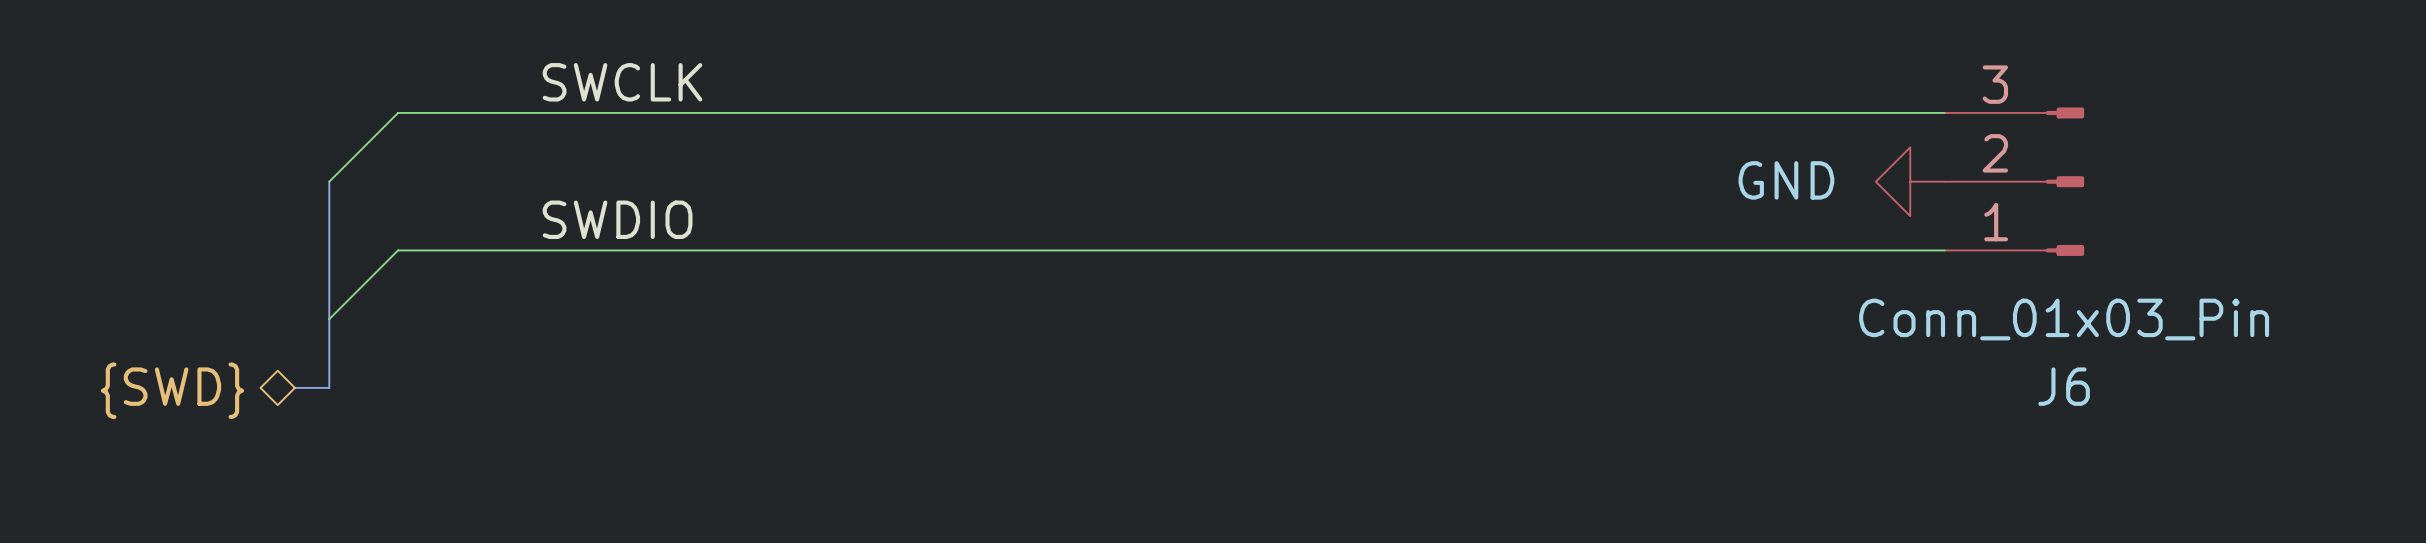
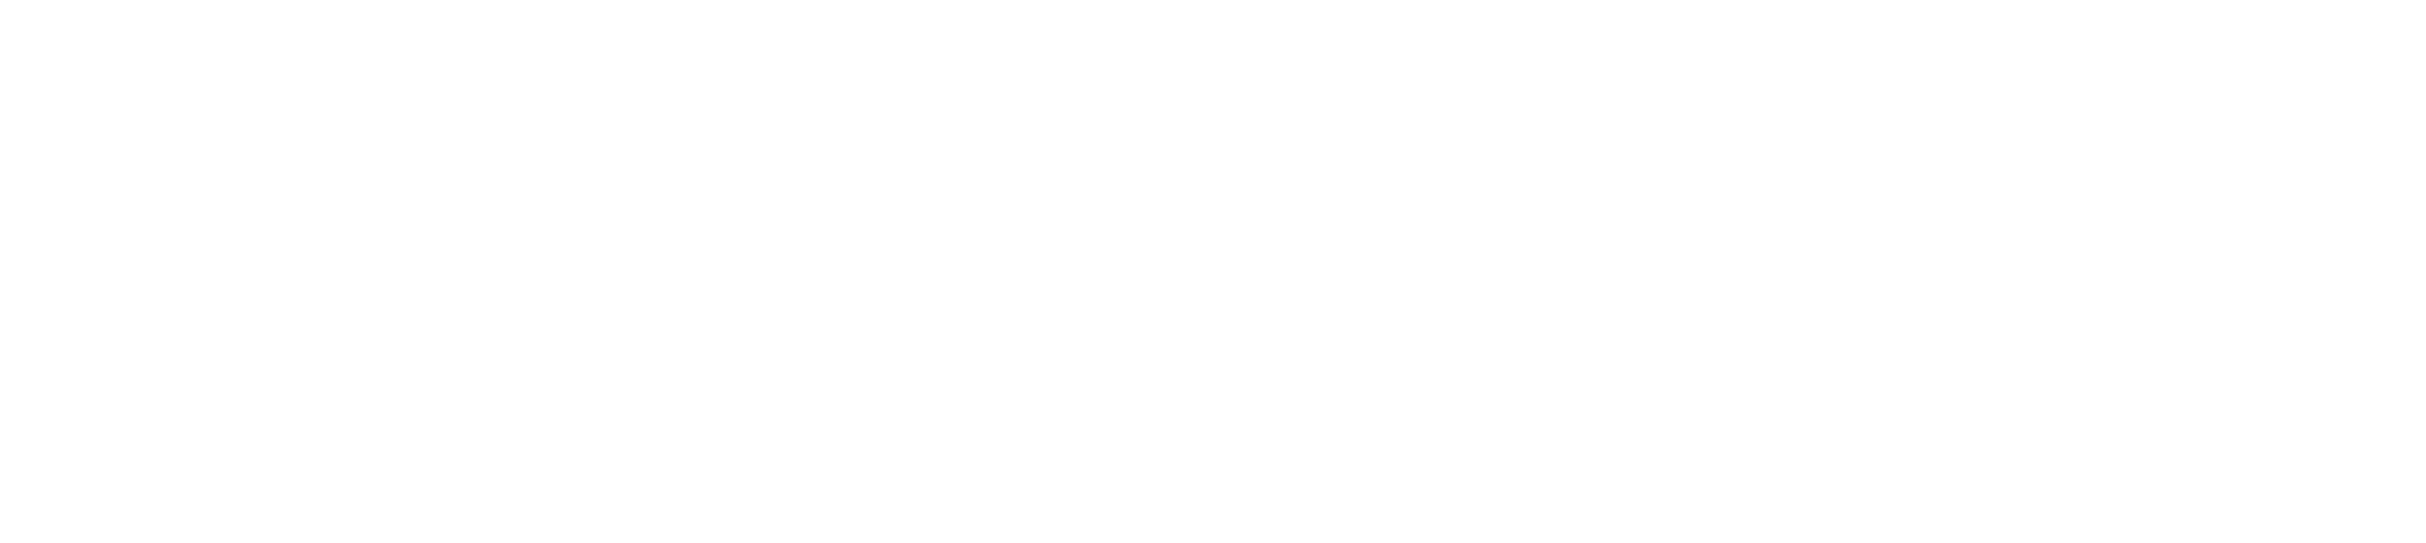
label: SWCLK (622, 82) -> none
wire: (1944, 112) (398, 112) (329, 181) -> none
bus: (329, 181) (329, 387) (294, 387) -> none
power symbol: GND (1910, 181) -> none
J6: Conn_01x03_Pin (2014, 181) -> none
label: SWDIO (617, 219) -> none
wire: (1944, 250) (398, 250) (329, 319) -> none
hierarchical label: {SWD} (172, 390) -> none

